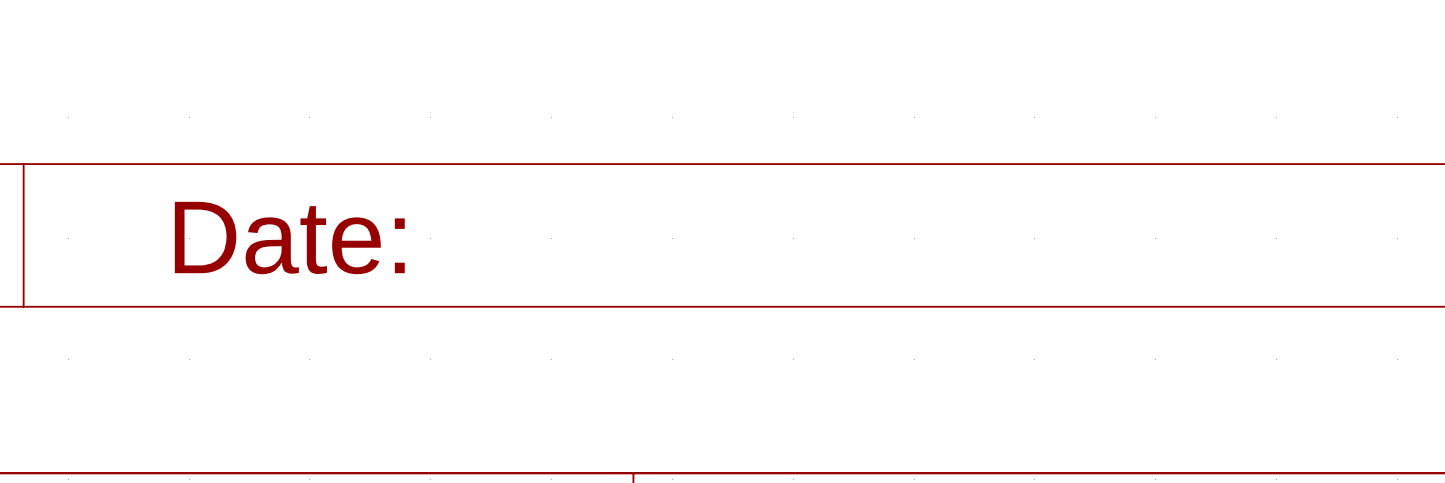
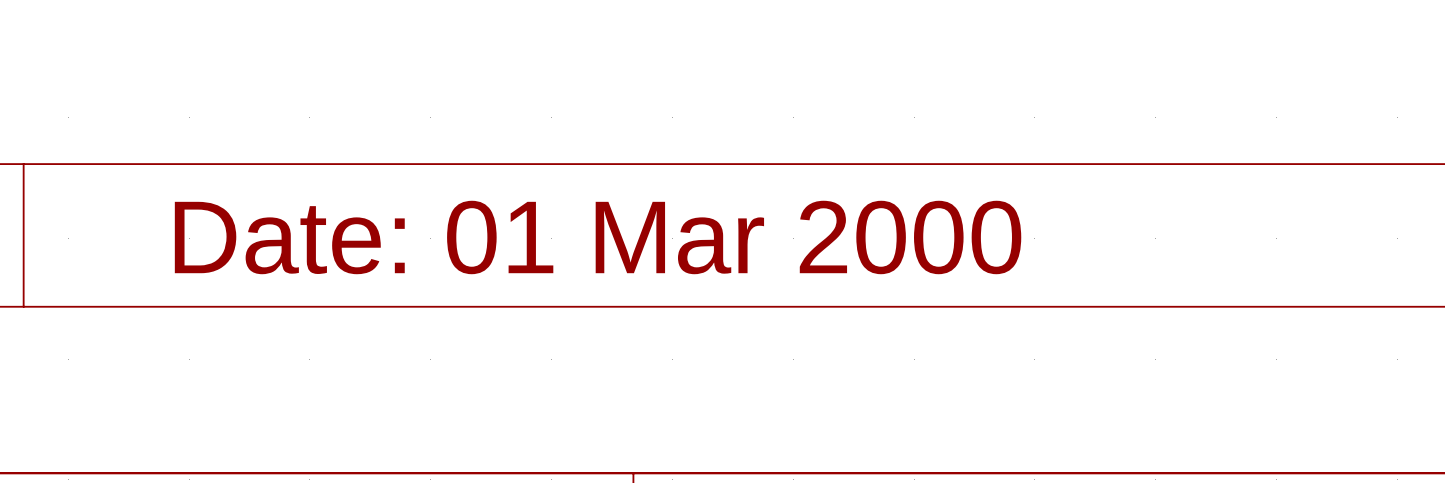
title block: Date: (289, 238) -> Date: 01 Mar 2000 (598, 237)

